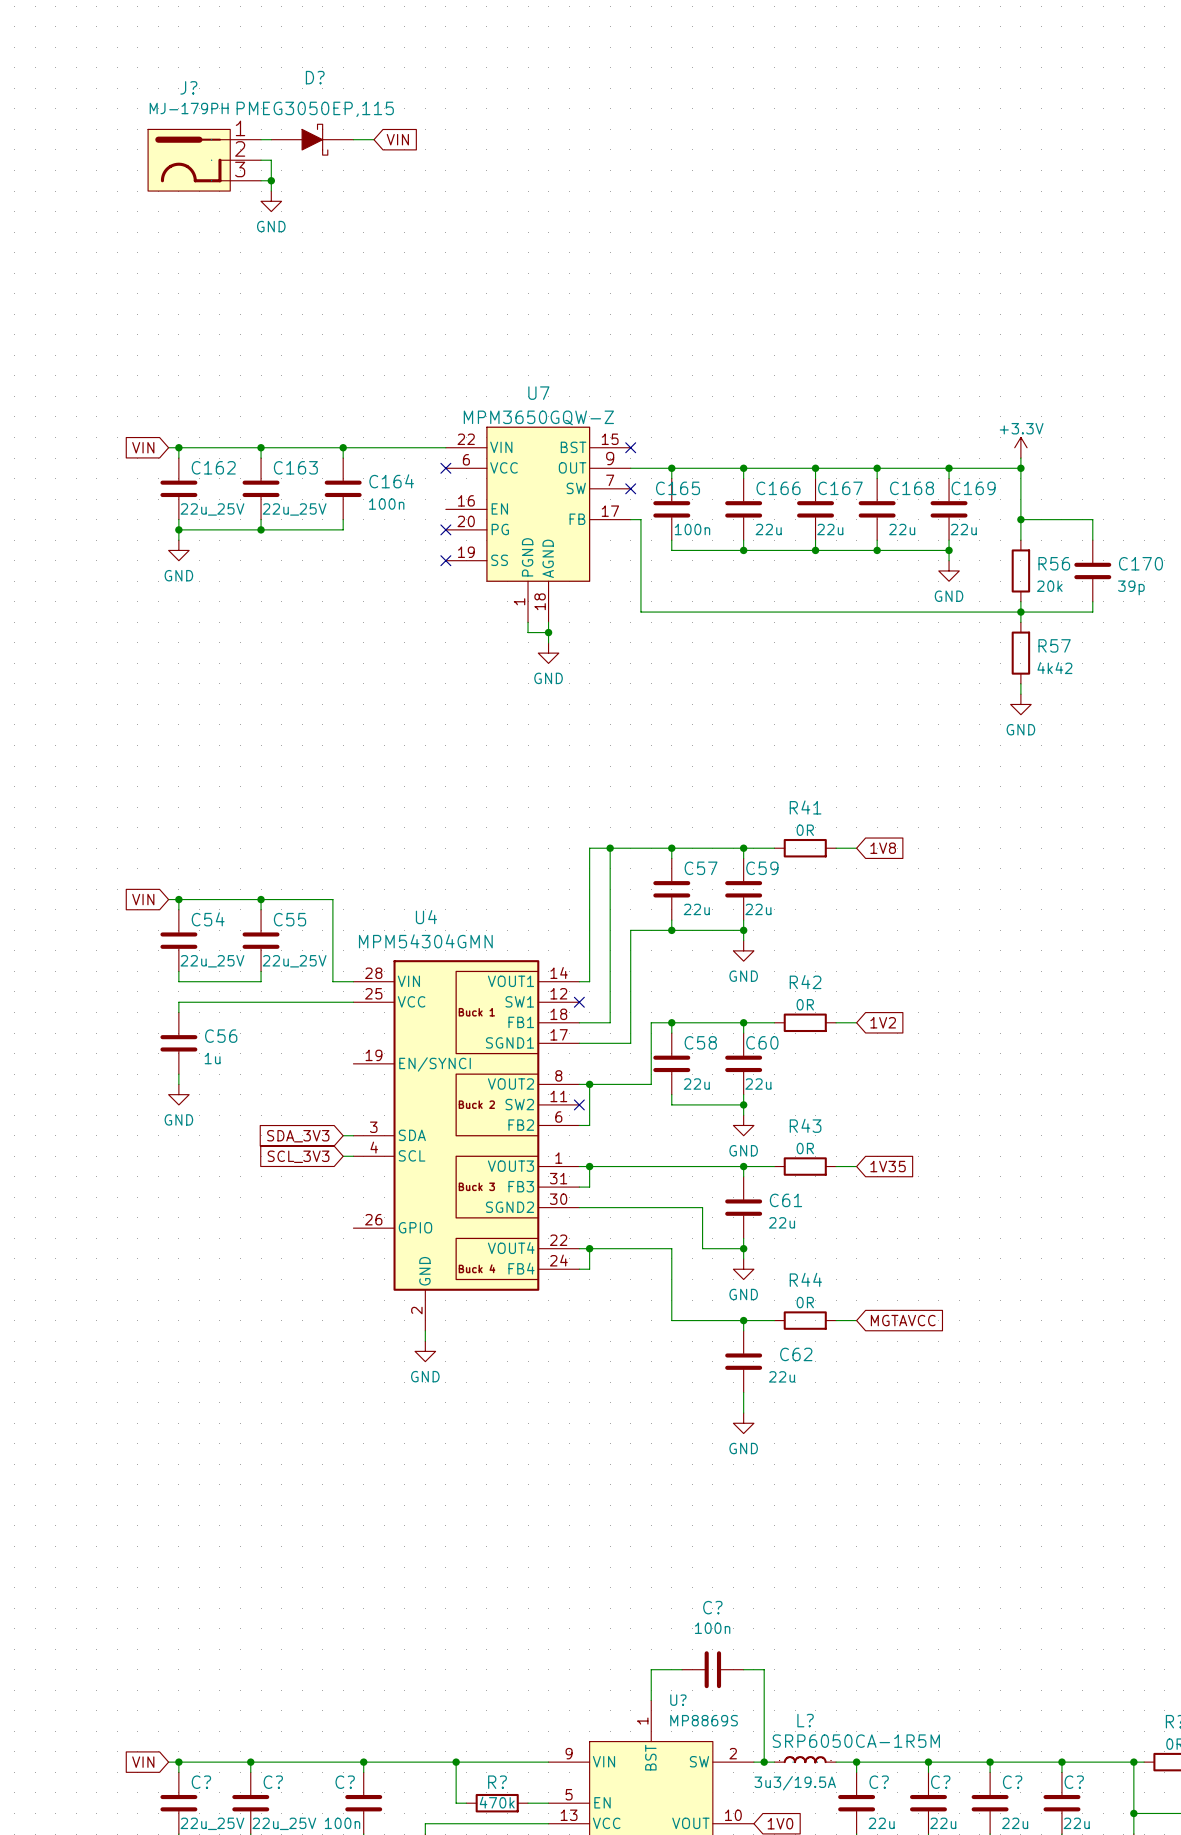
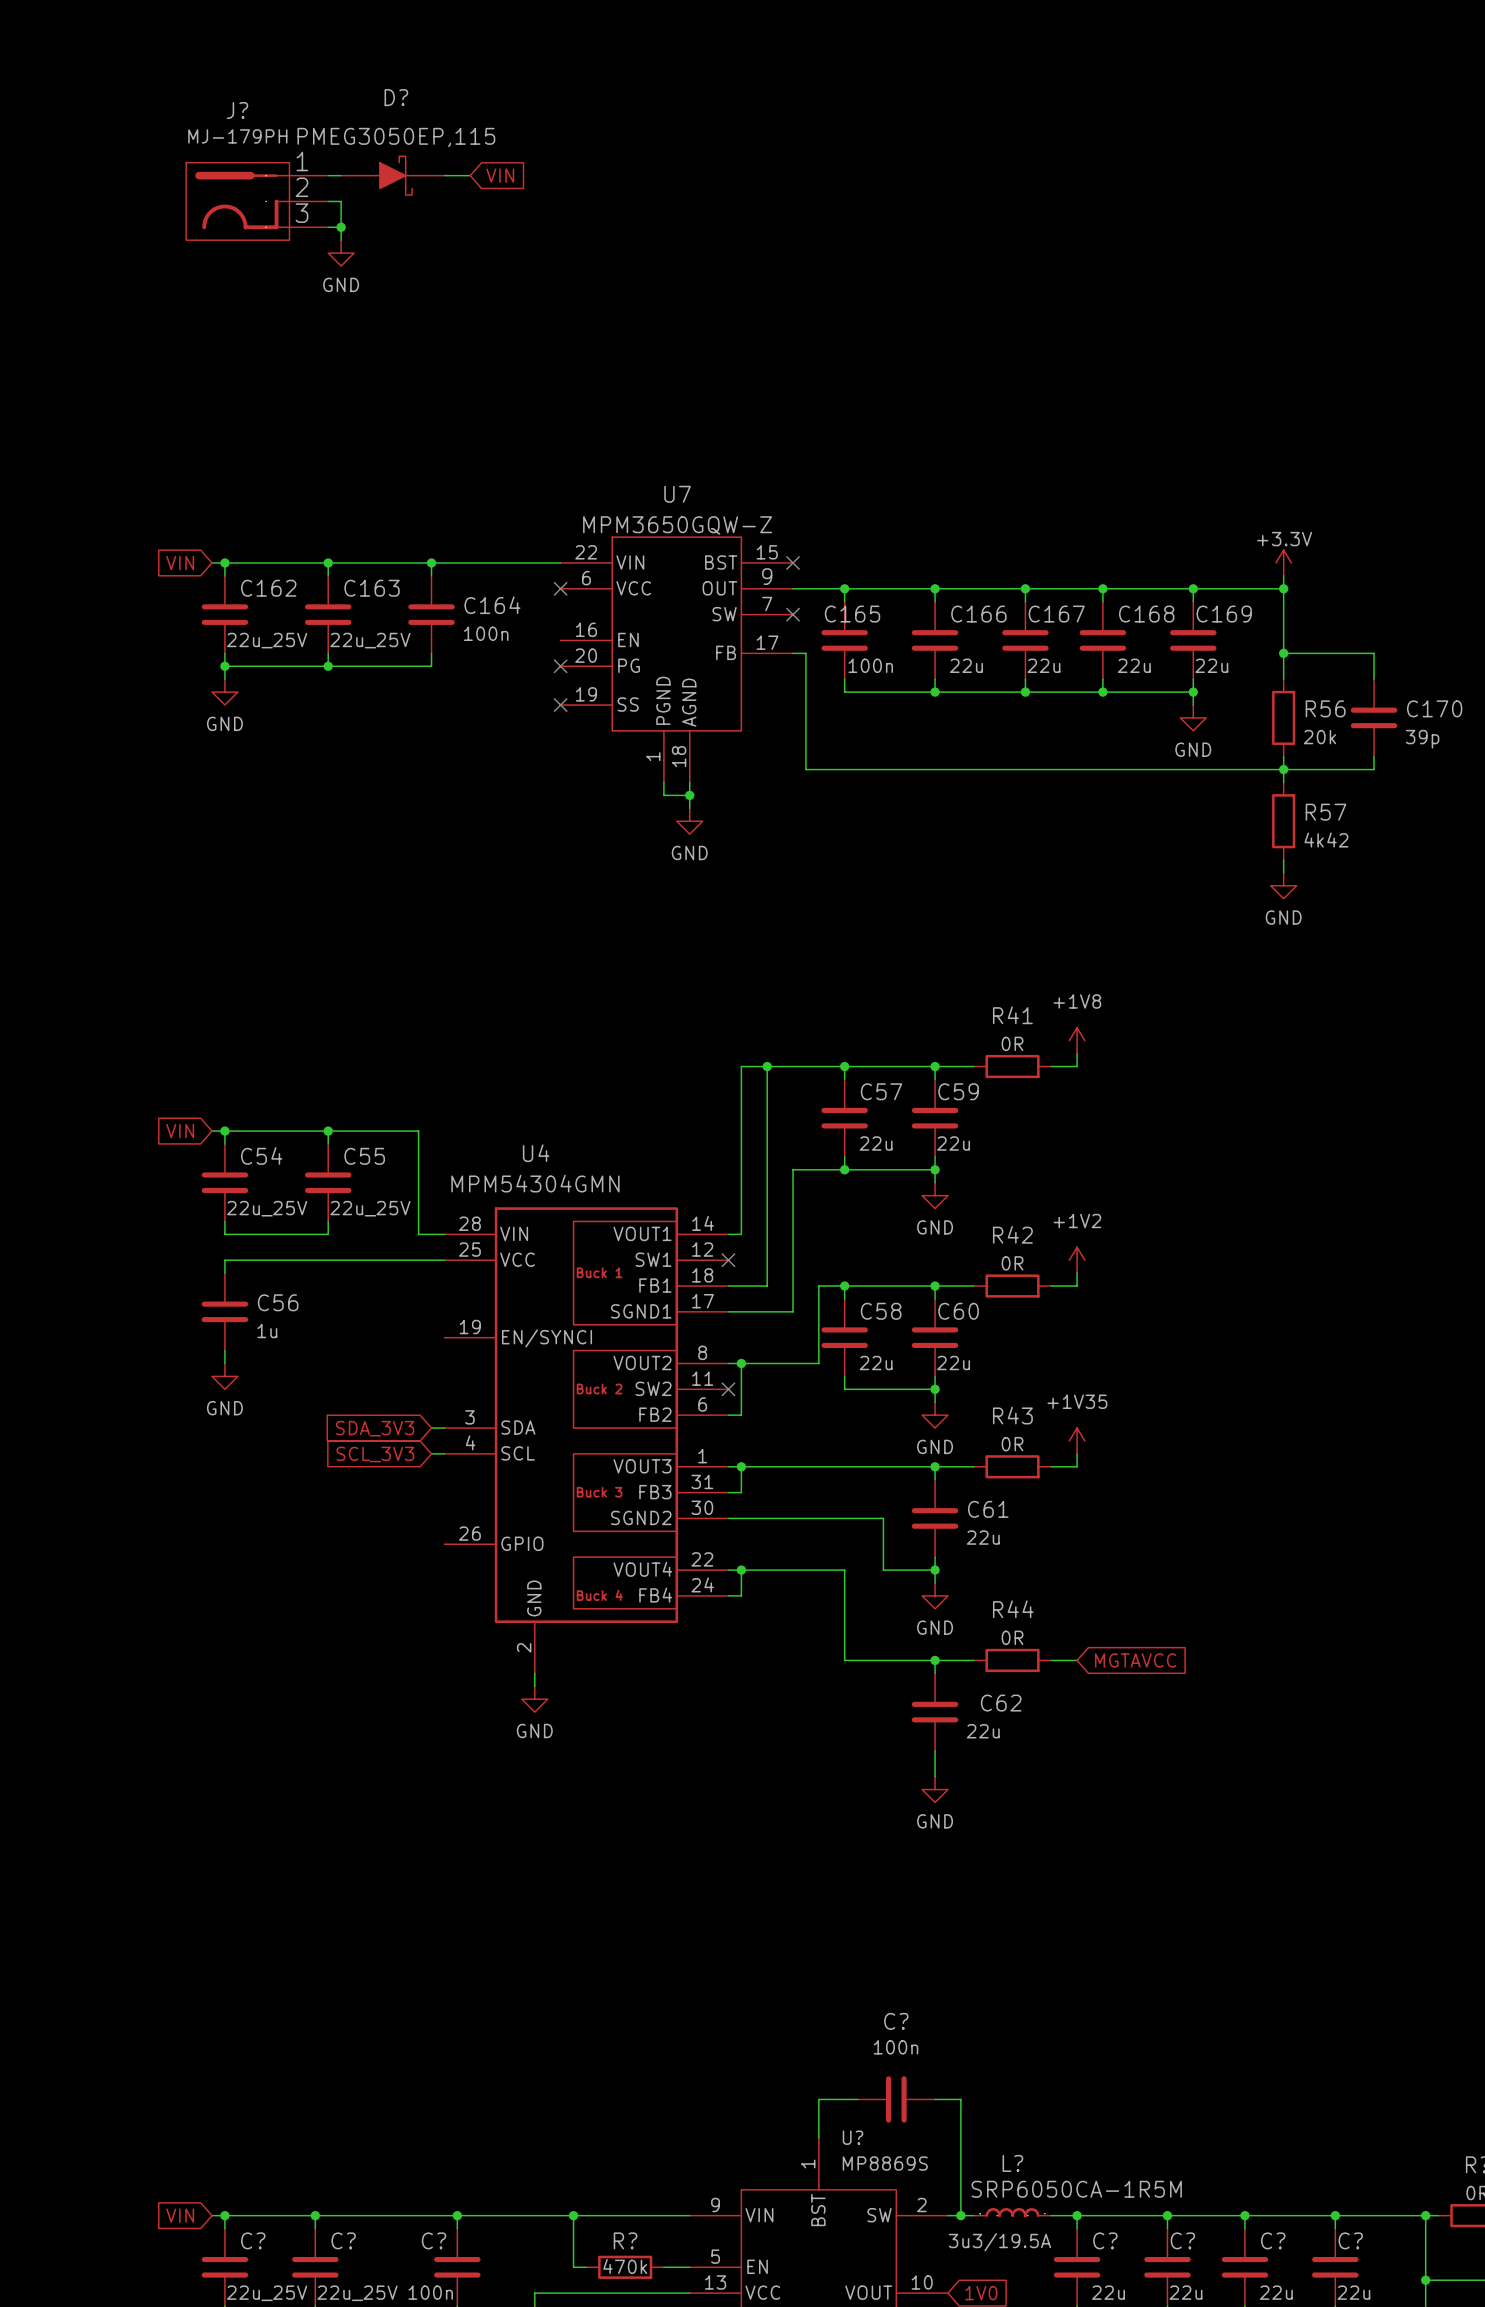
power symbol: none -> +1V8 (1077, 1040)
wire: none -> (1077, 1053) (1077, 1066)
global label: 1V8 (883, 848) -> none
power symbol: none -> +1V2 (1077, 1260)
wire: none -> (1077, 1273) (1077, 1286)
global label: 1V2 (883, 1022) -> none
power symbol: none -> +1V35 (1077, 1440)
wire: none -> (1077, 1453) (1077, 1466)
global label: 1V35 (888, 1166) -> none

